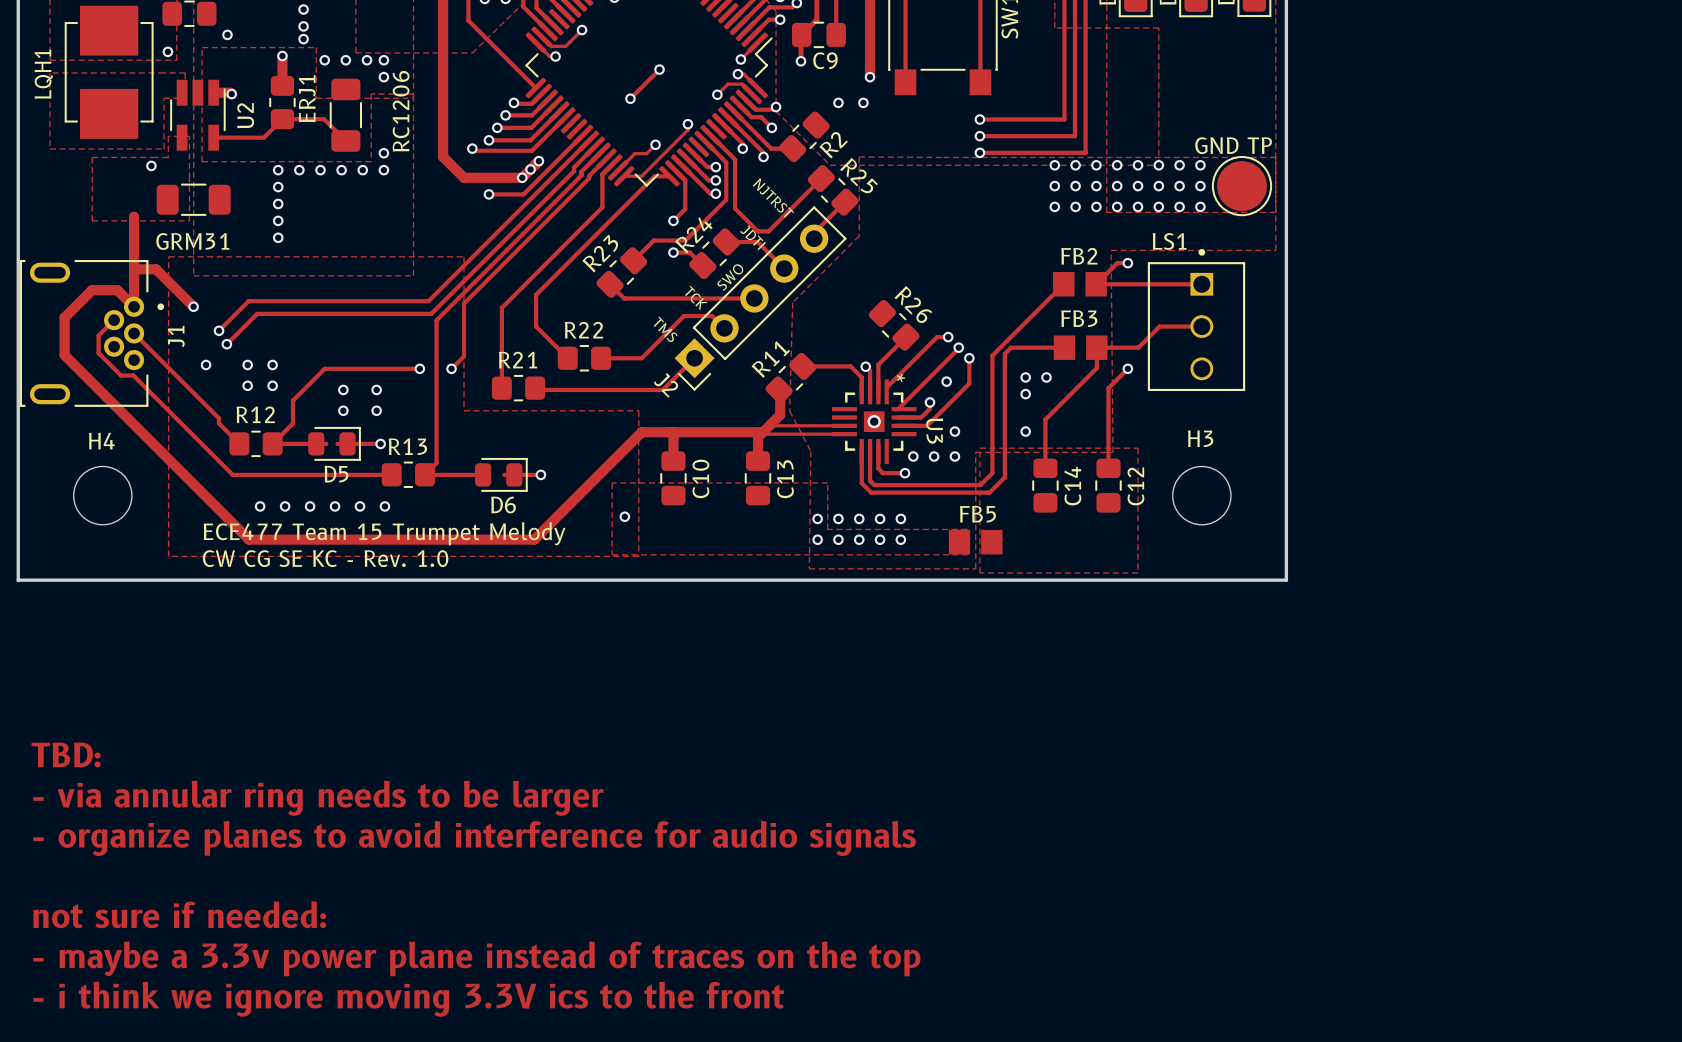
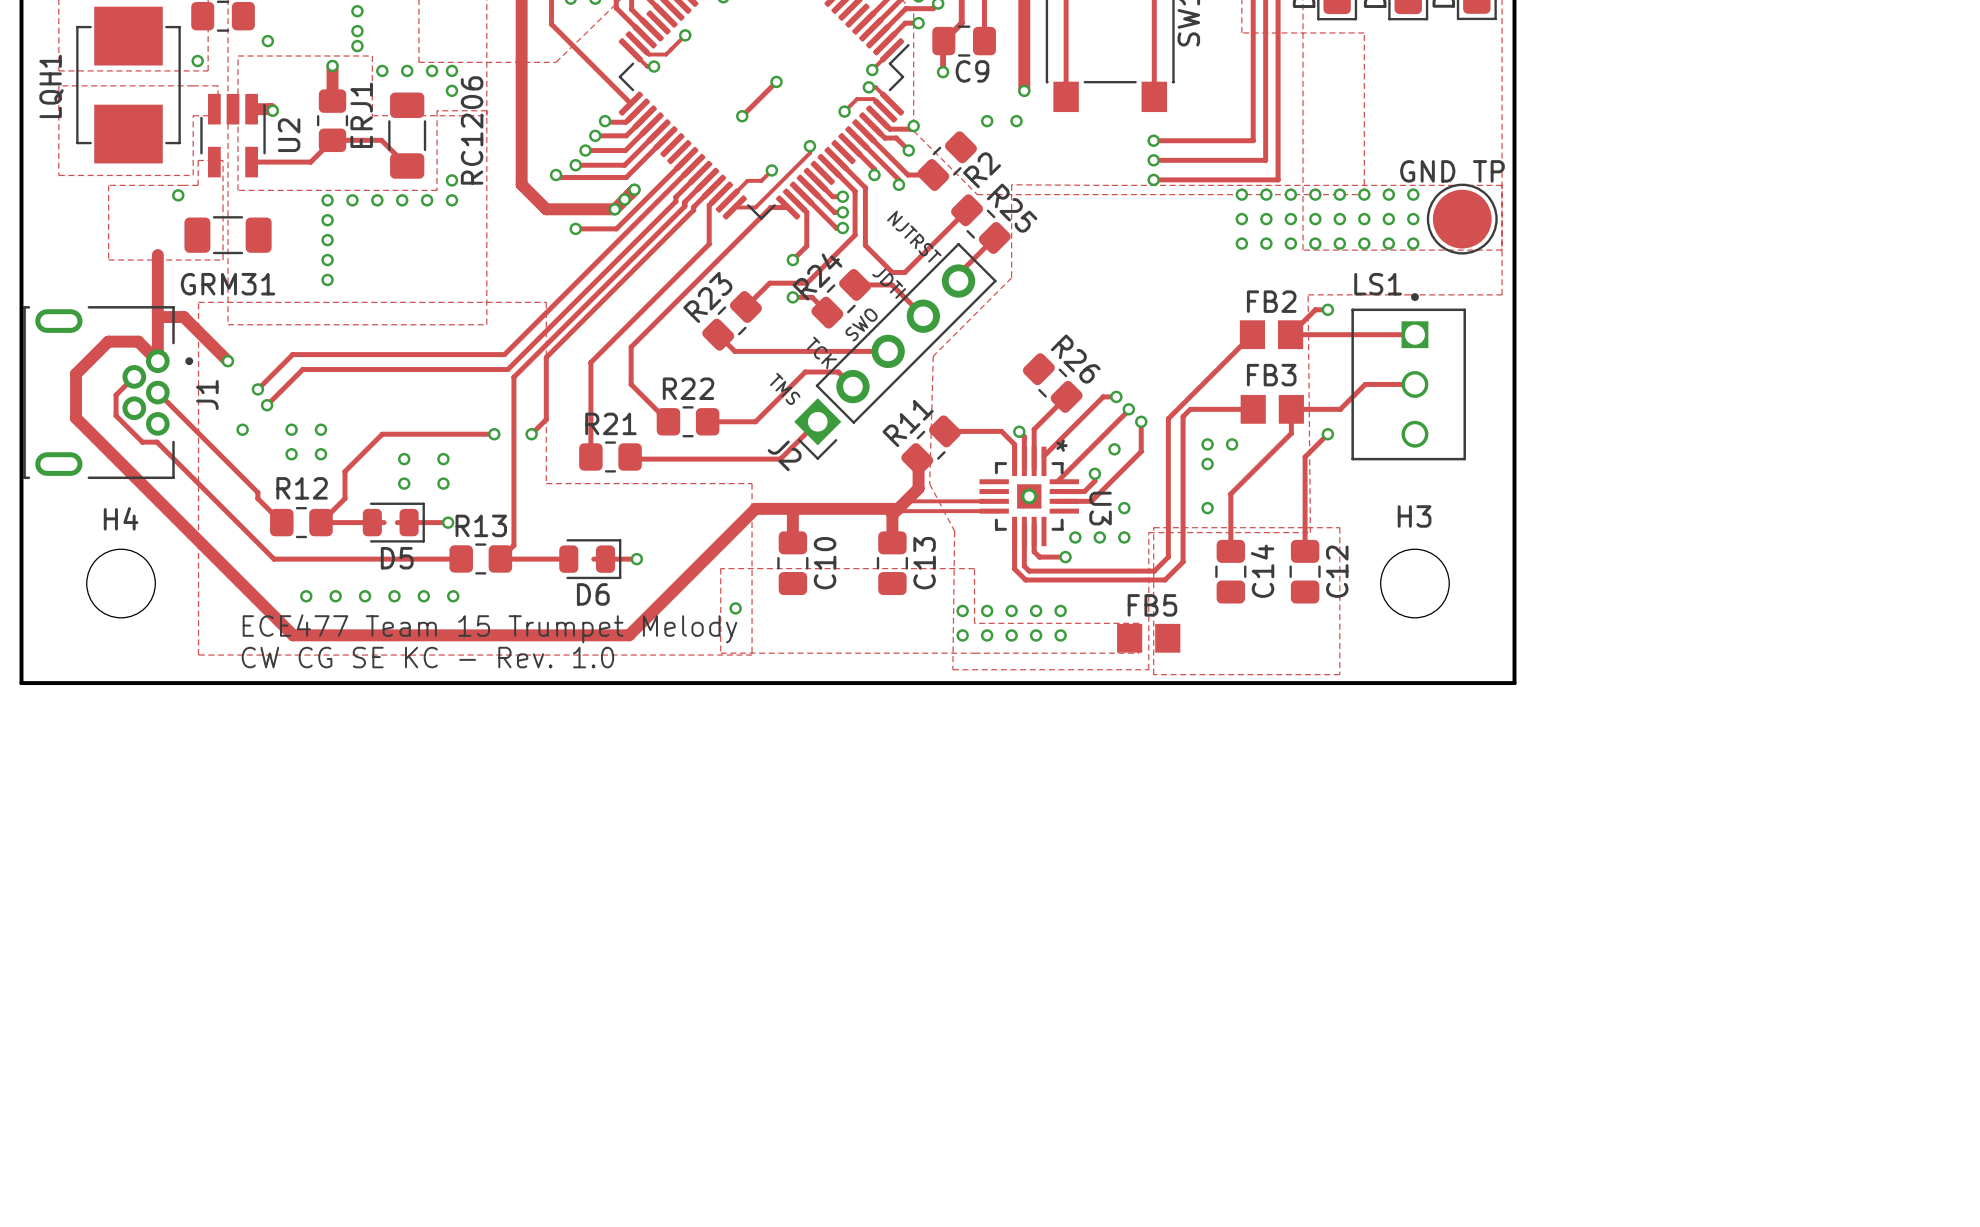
text: TBD: (66, 754) -> none
text: - via annular ring needs to be larger (318, 798) -> none
text: - organize planes to avoid interference for audio signals (474, 838) -> none
text: not sure if needed: (179, 914) -> none
text: - maybe a 3.3v power plane instead of traces on the top (476, 958) -> none
text: - i think we ignore moving 3.3V ics to the front (408, 999) -> none

